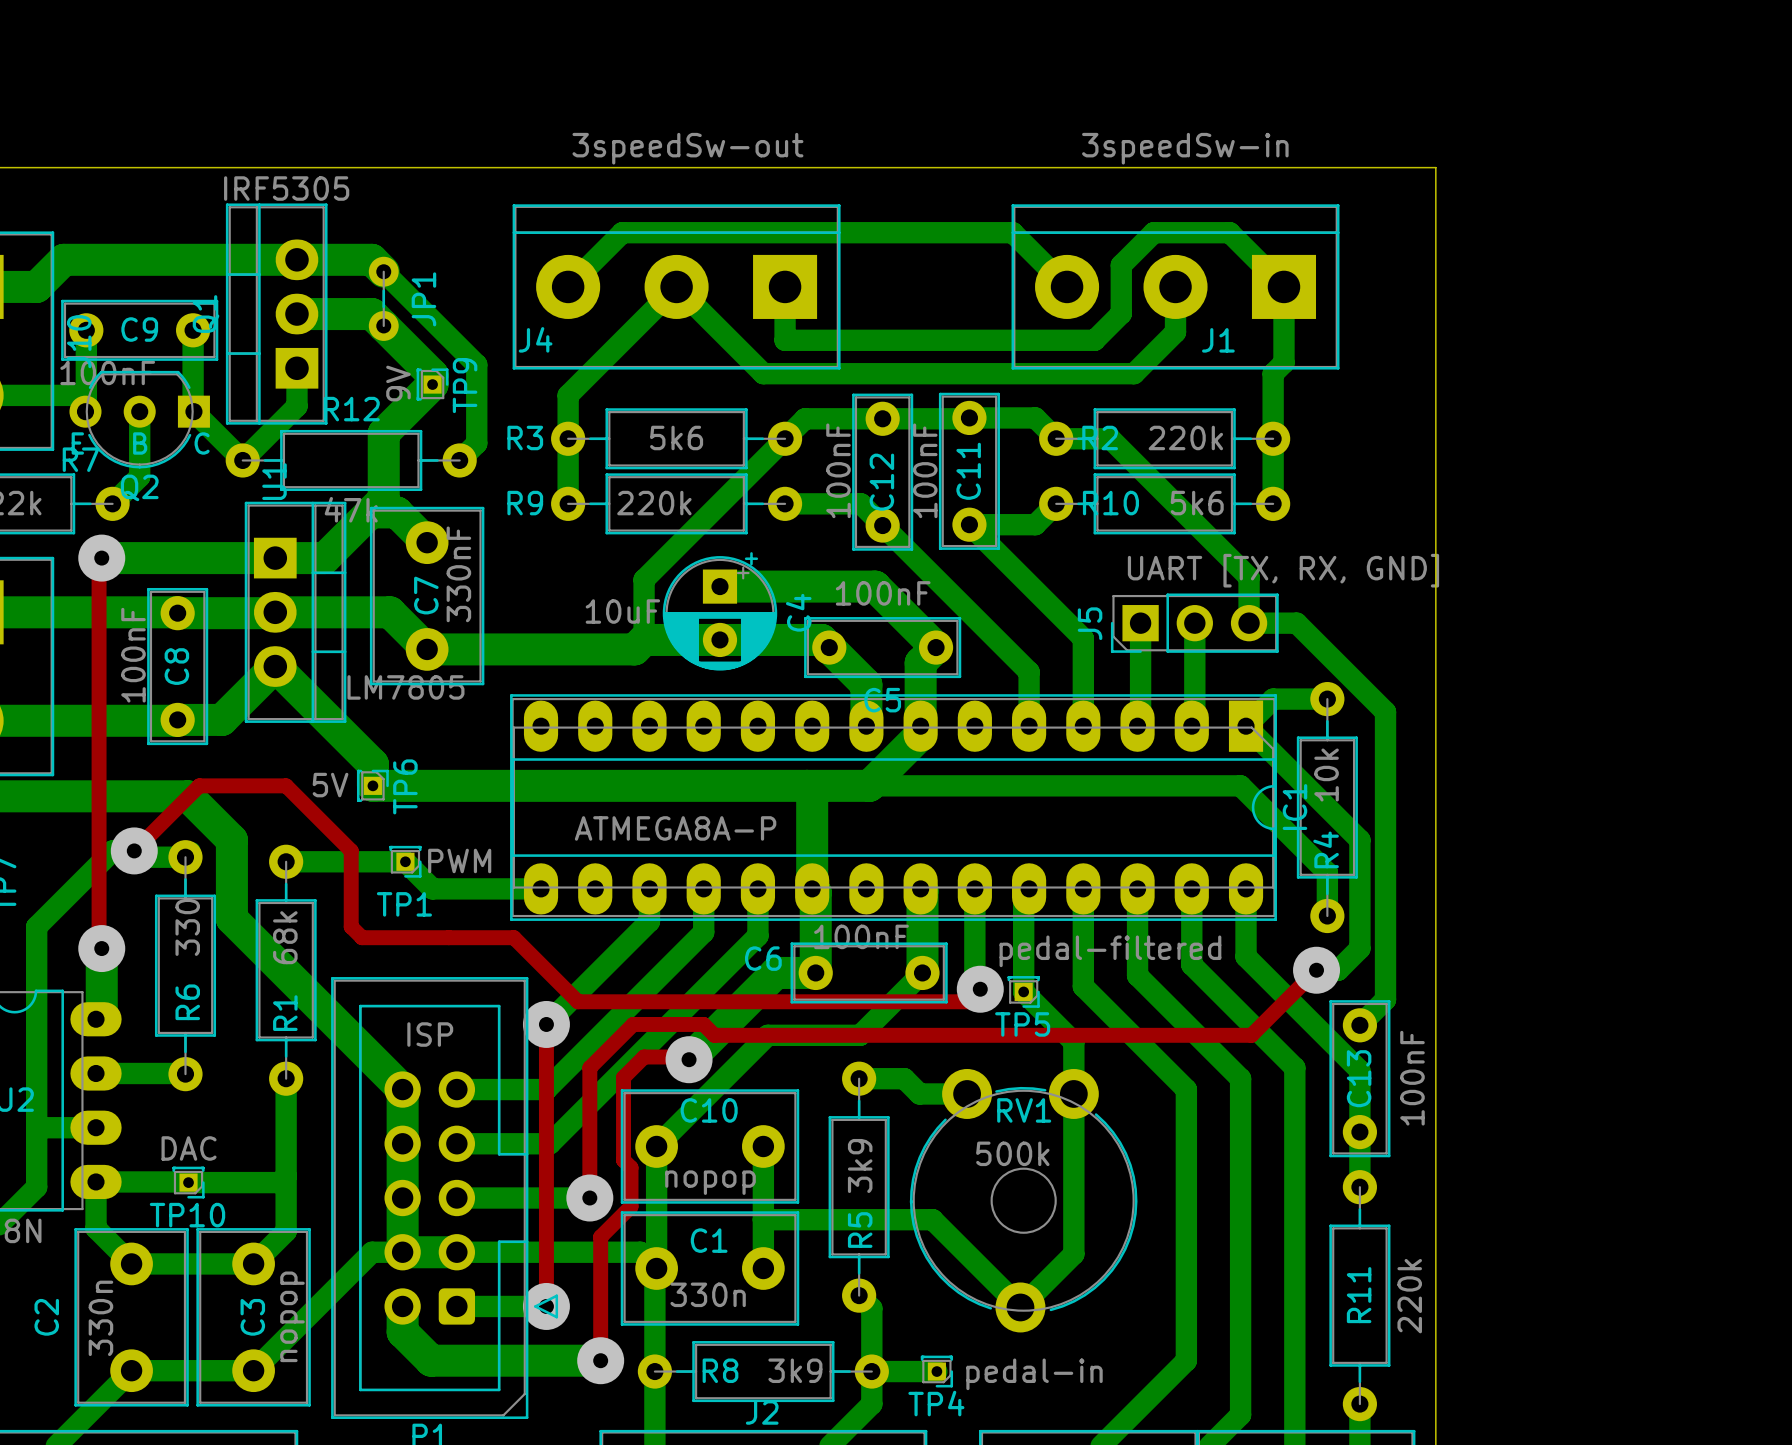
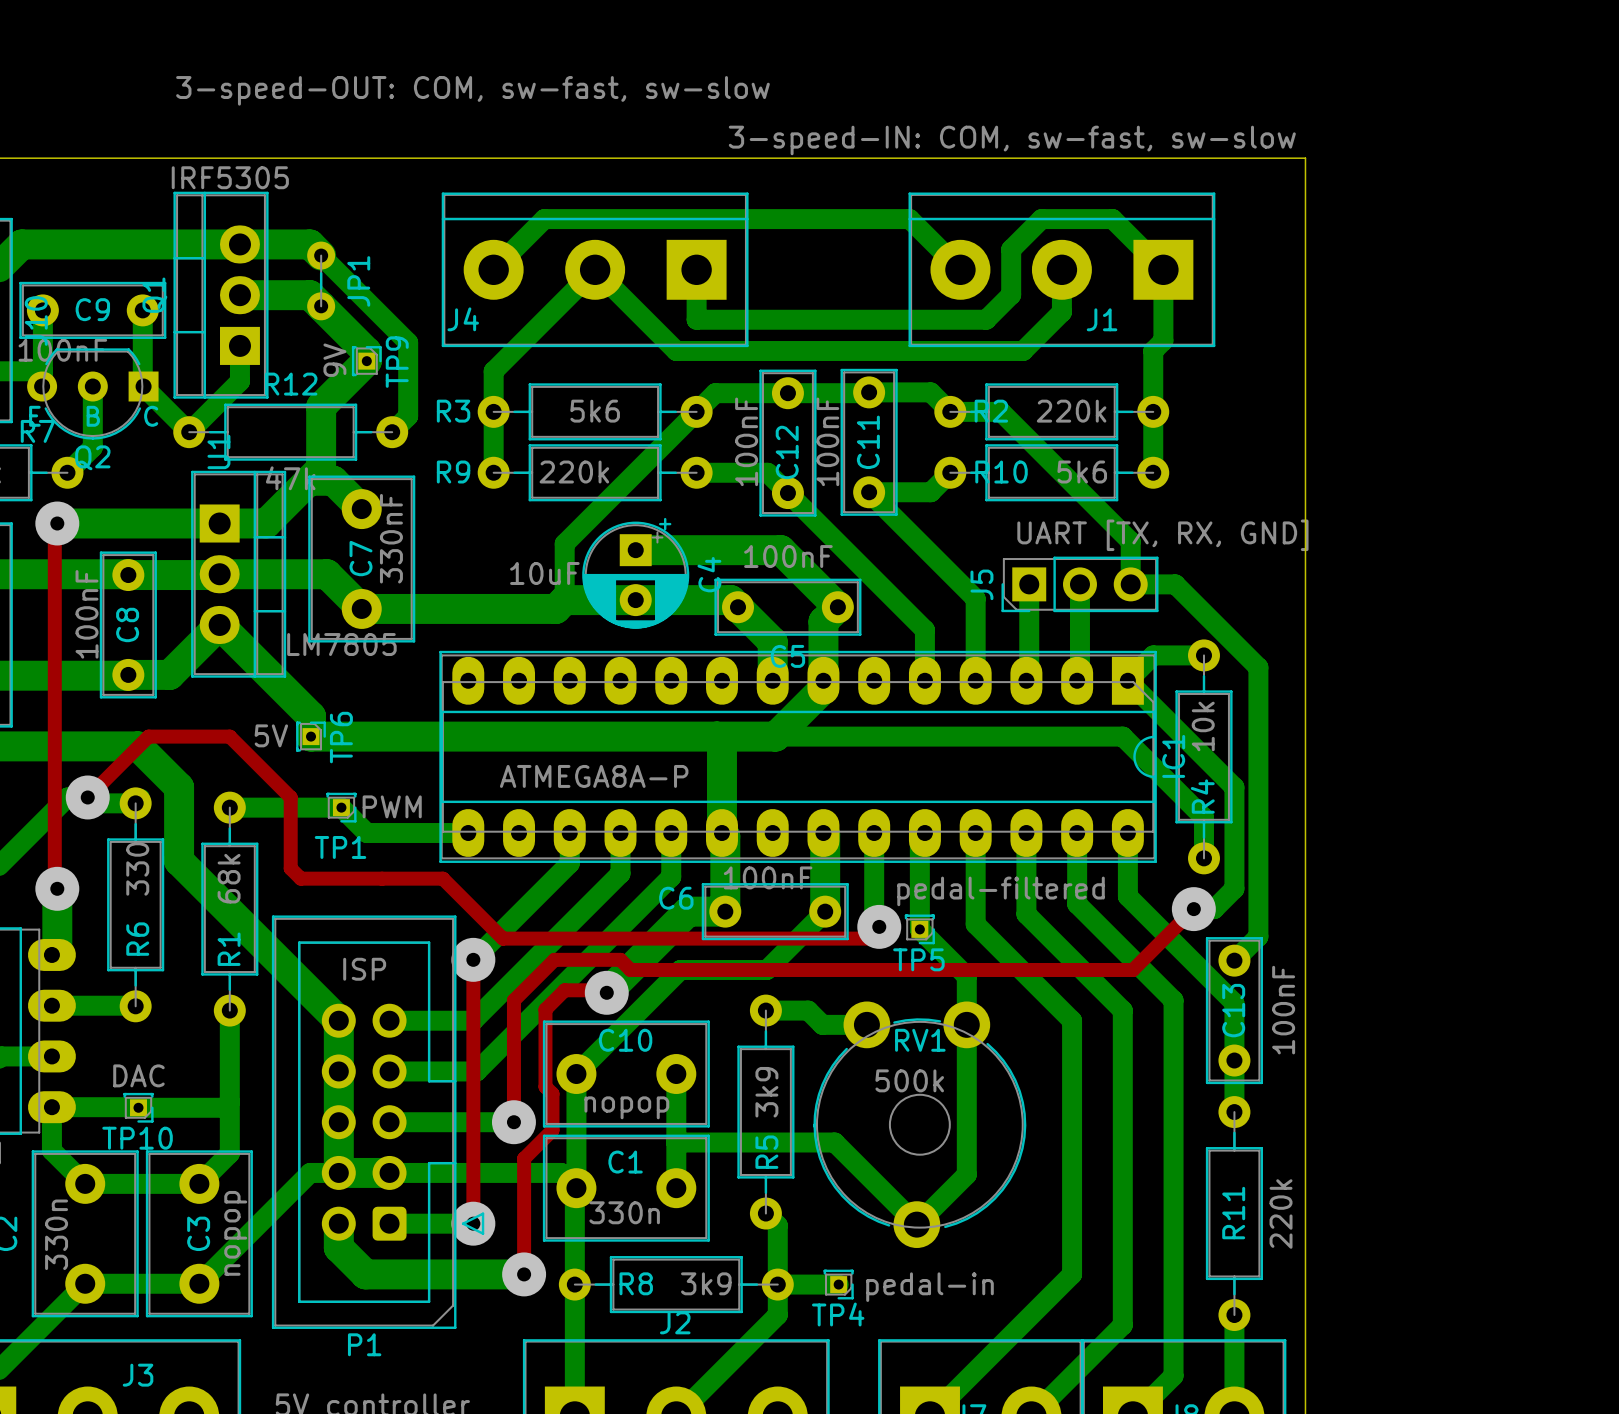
J4 value: 3speedSw-out (687, 148) -> 3-speed-OUT: COM, sw-fast, sw-slow (472, 90)
J1 value: 3speedSw-in (1185, 148) -> 3-speed-IN: COM, sw-fast, sw-slow (1012, 140)

